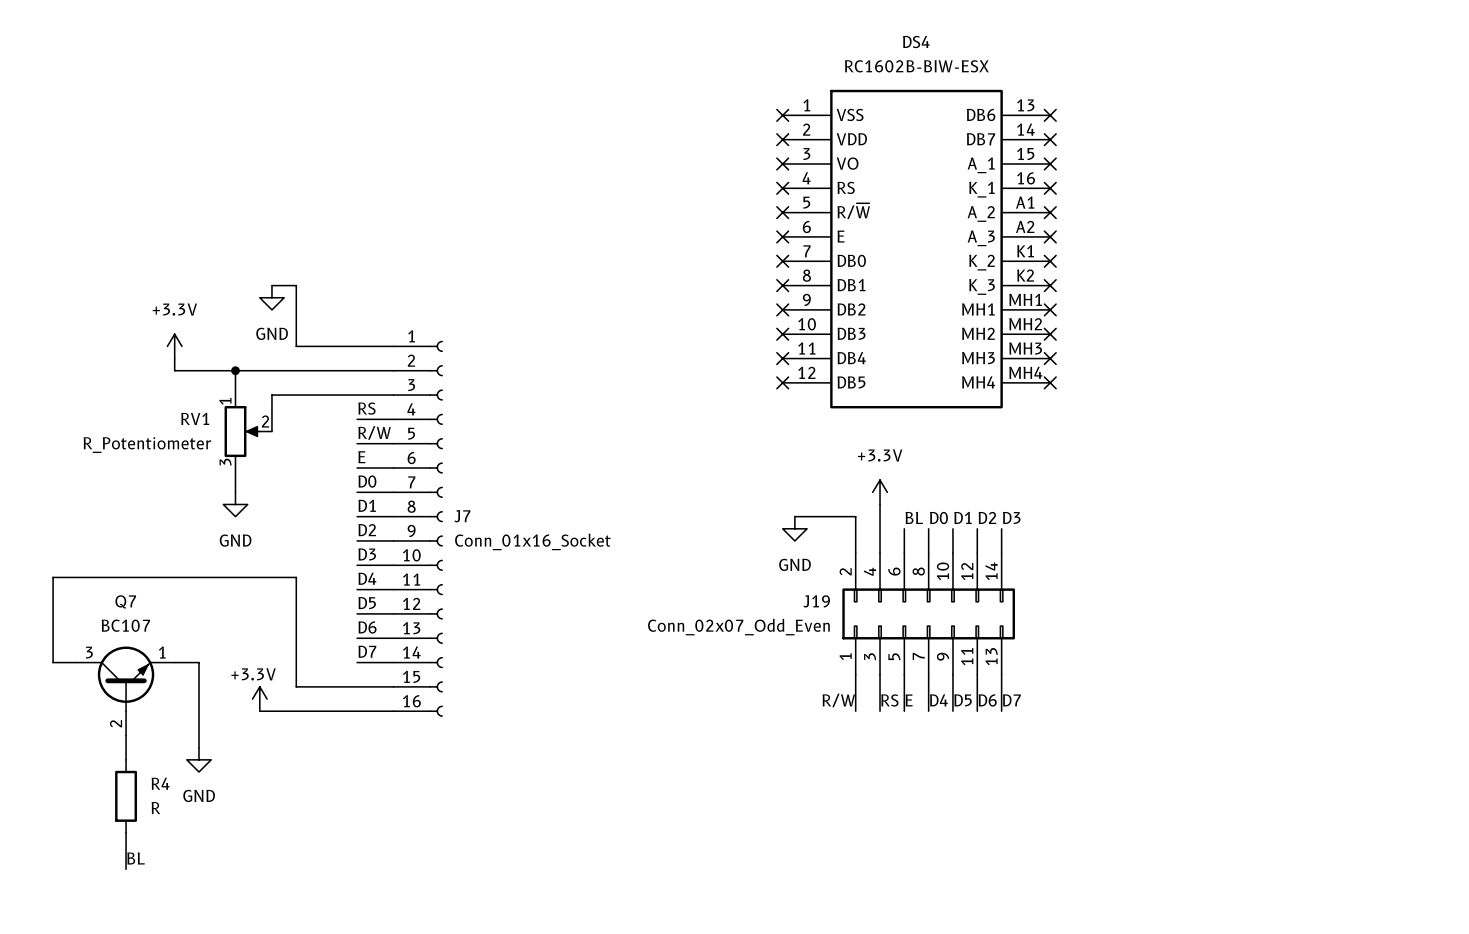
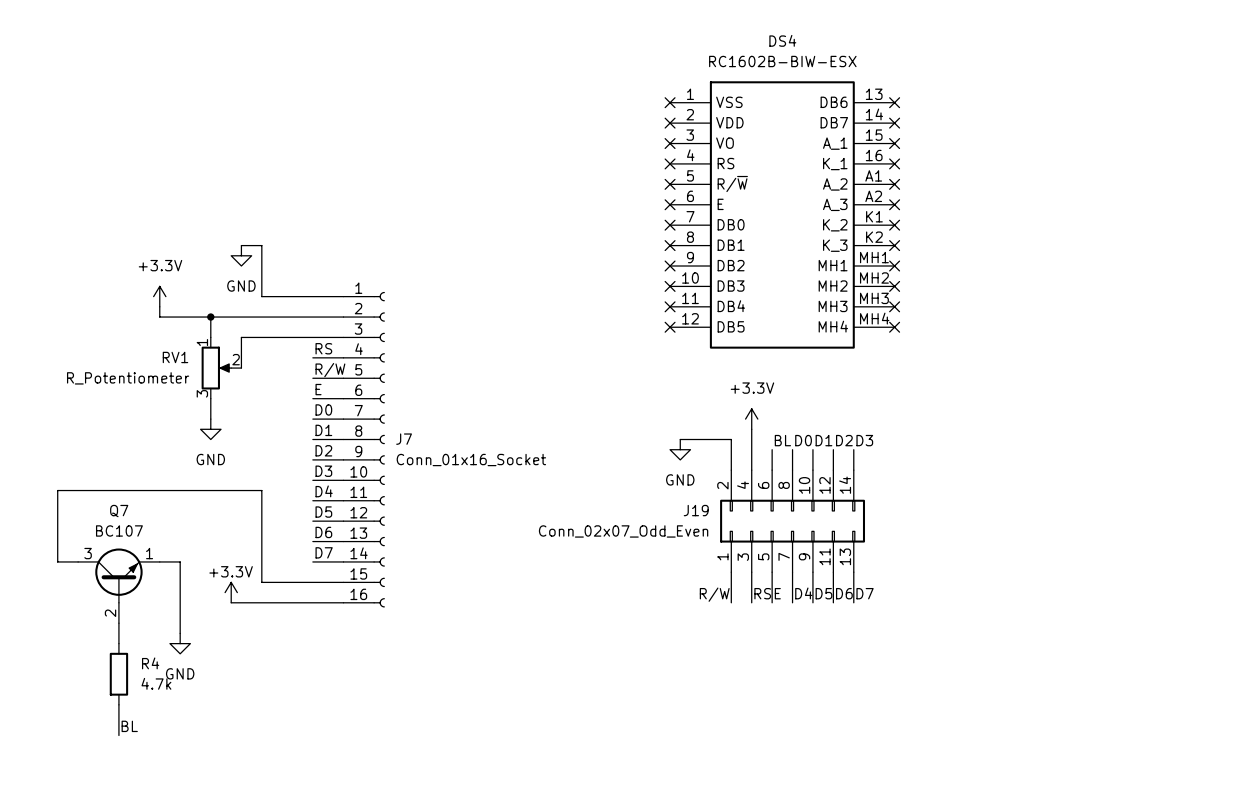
R4 value: R (155, 808) -> 4.7k (156, 683)

